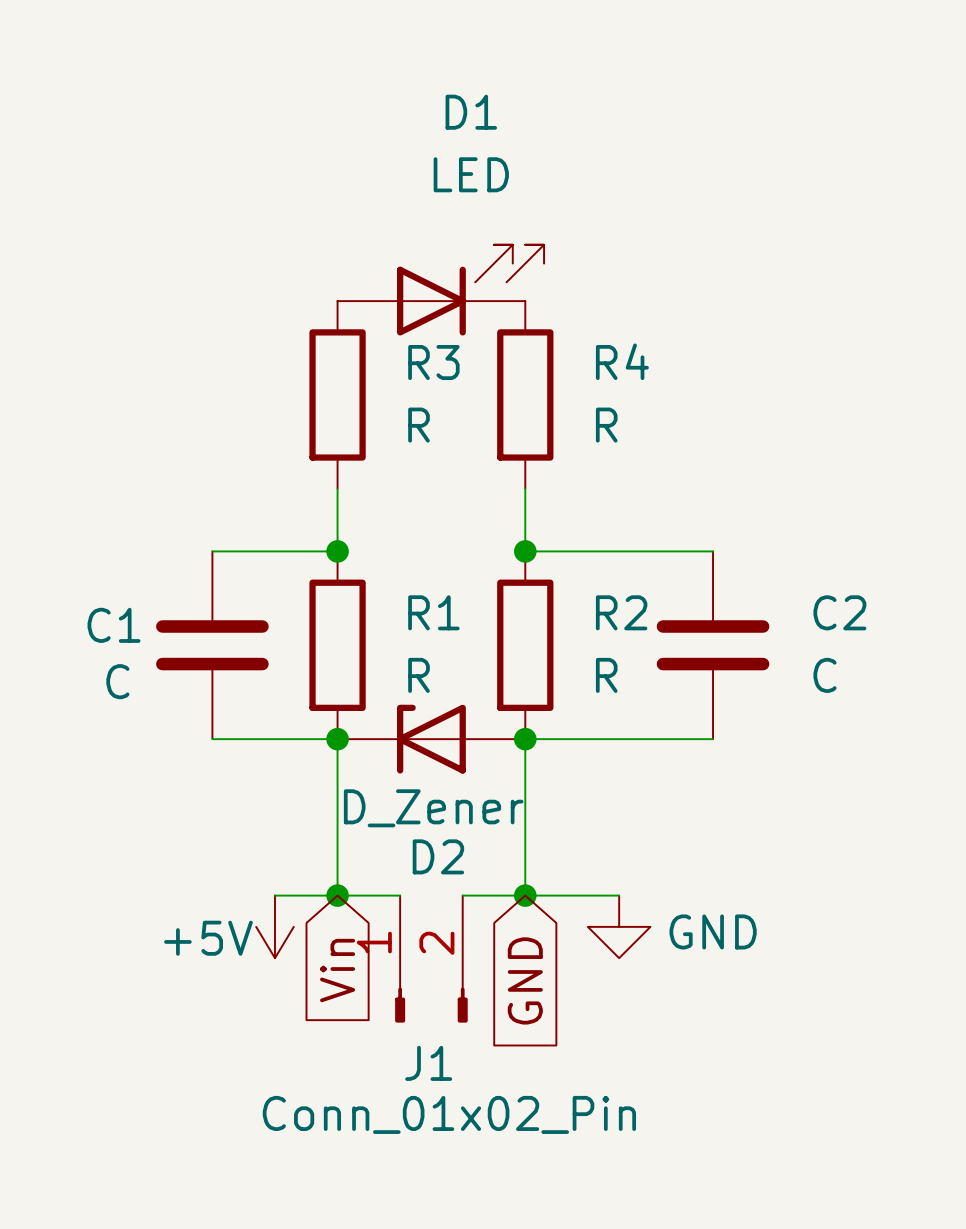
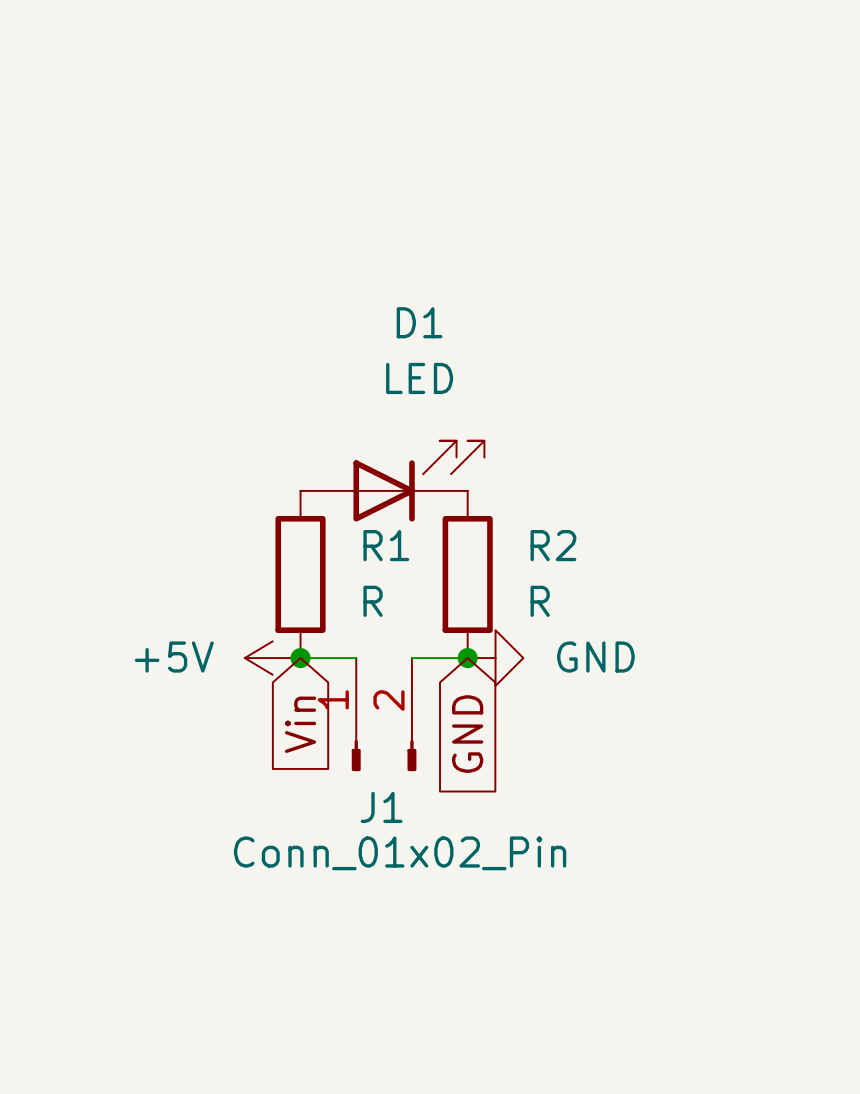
D1 position: (440, 290) -> (392, 481)
R3: R (337, 394) -> none
R4: R (525, 394) -> none
wire: (337, 488) (337, 551) (212, 551) -> none
wire: (525, 488) (525, 551) (713, 551) -> none
junction: (337, 551) -> none
junction: (525, 551) -> none
C1: C (212, 645) -> none
C2: C (713, 645) -> none
wire: (212, 739) (337, 739) (337, 895) -> none
D2: D_Zener (431, 739) -> none
wire: (713, 739) (525, 739) (525, 895) -> none
wire: (274, 895) (400, 895) -> none
junction: (337, 895) -> none
wire: (462, 895) (619, 895) -> none
junction: (525, 895) -> none
power symbol rotation: 0° (274, 926) -> 90° clockwise (272, 658)
power symbol position: +5V (274, 926) -> +5V (272, 658)
power symbol rotation: 0° (619, 926) -> 90° counterclockwise (495, 658)
power symbol position: GND (619, 926) -> GND (495, 658)
power symbol text position: +5V (208, 938) -> +5V (174, 657)
J1 position: (431, 959) -> (384, 714)
global label position: Vin (337, 970) -> Vin (300, 724)
global label position: GND (525, 980) -> GND (467, 734)

